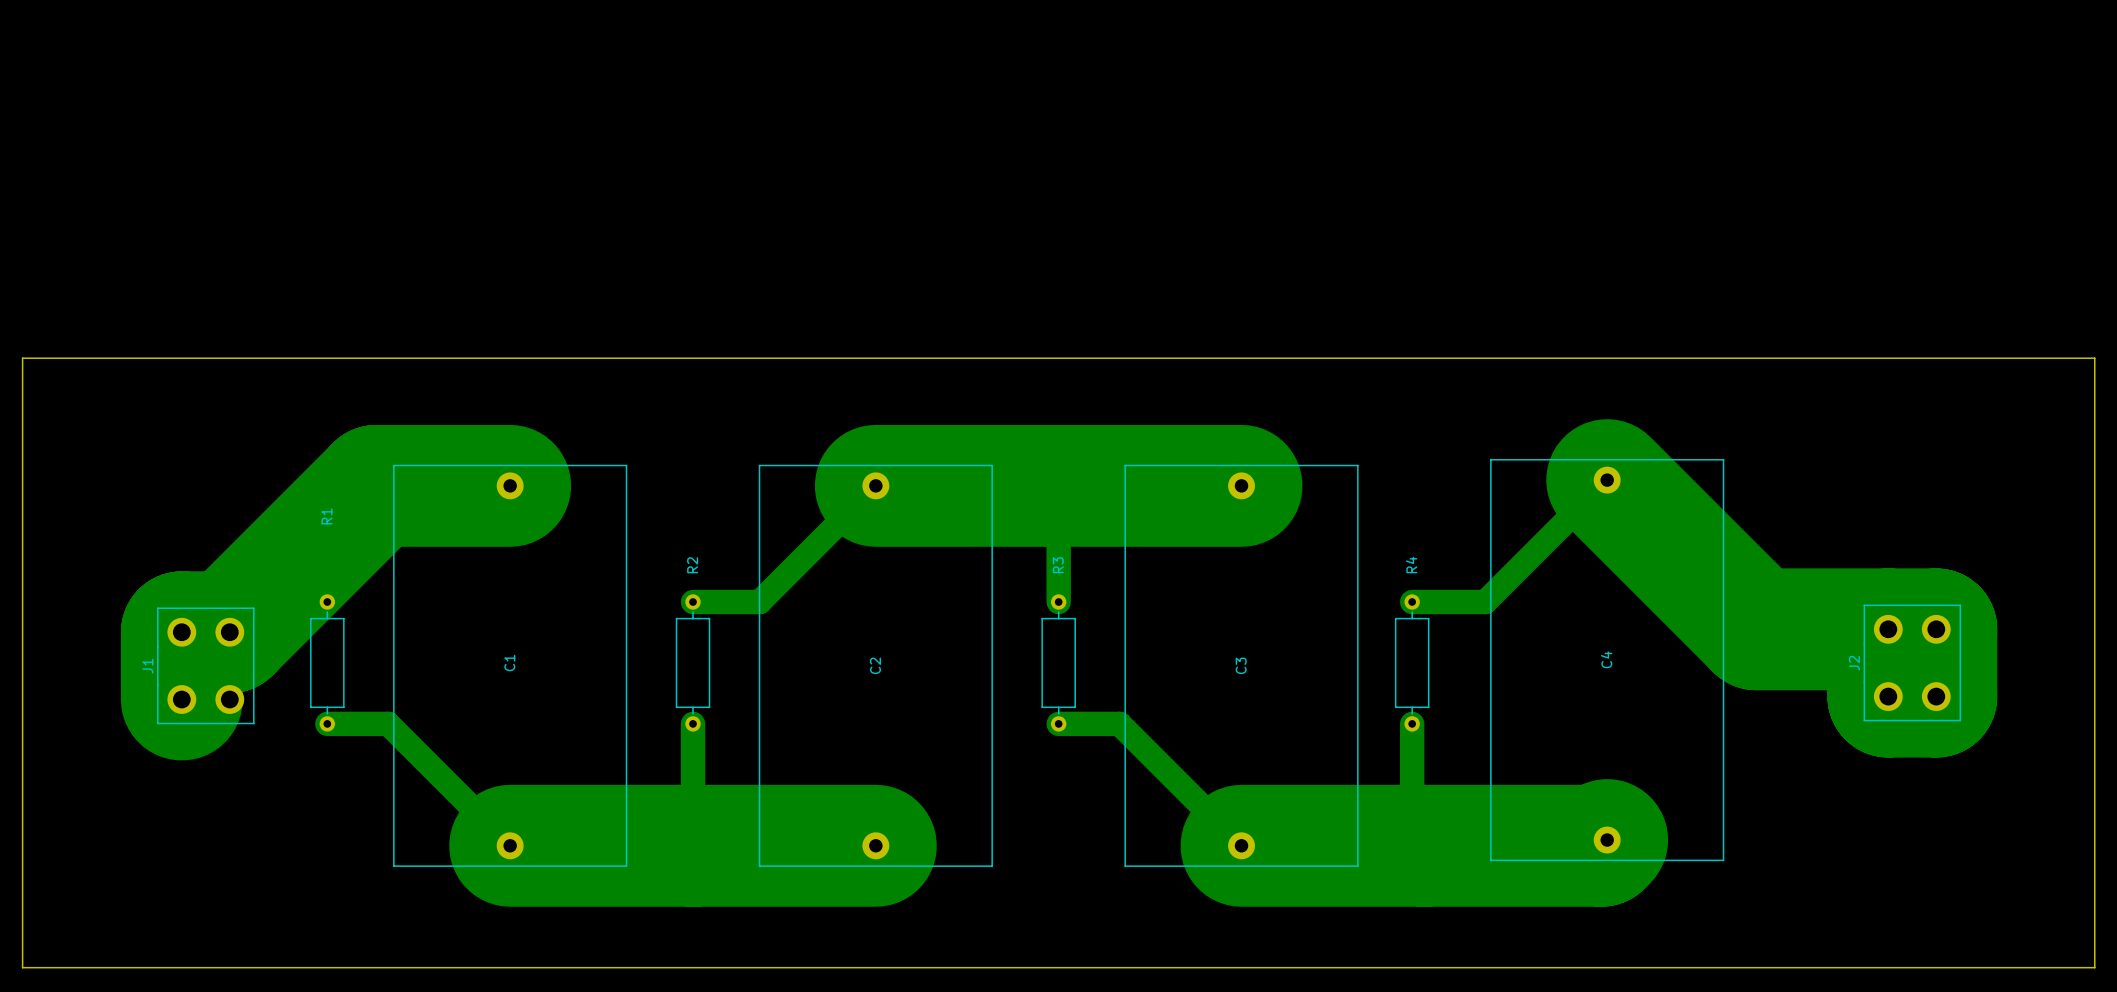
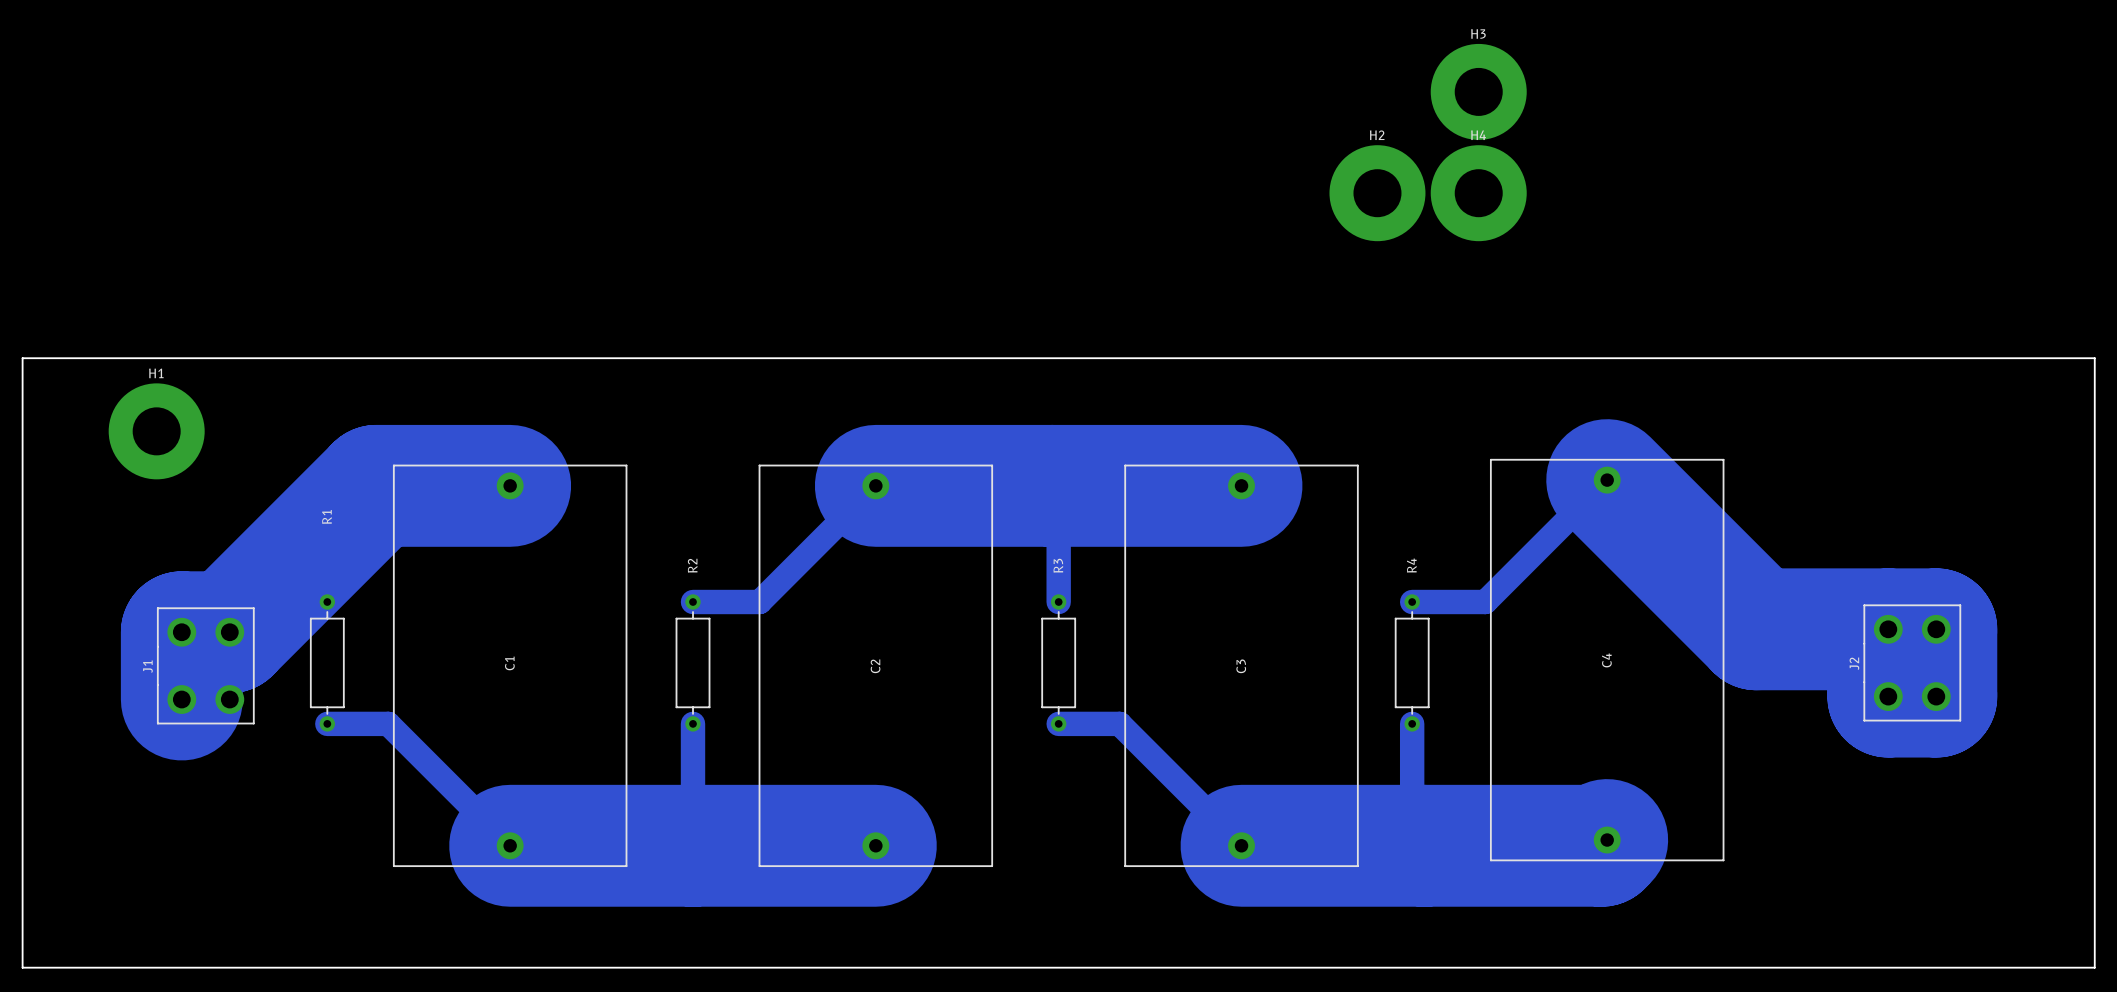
H3: none -> (1478, 91)
H2: none -> (1377, 193)
H4: none -> (1478, 193)
H1: none -> (156, 431)

